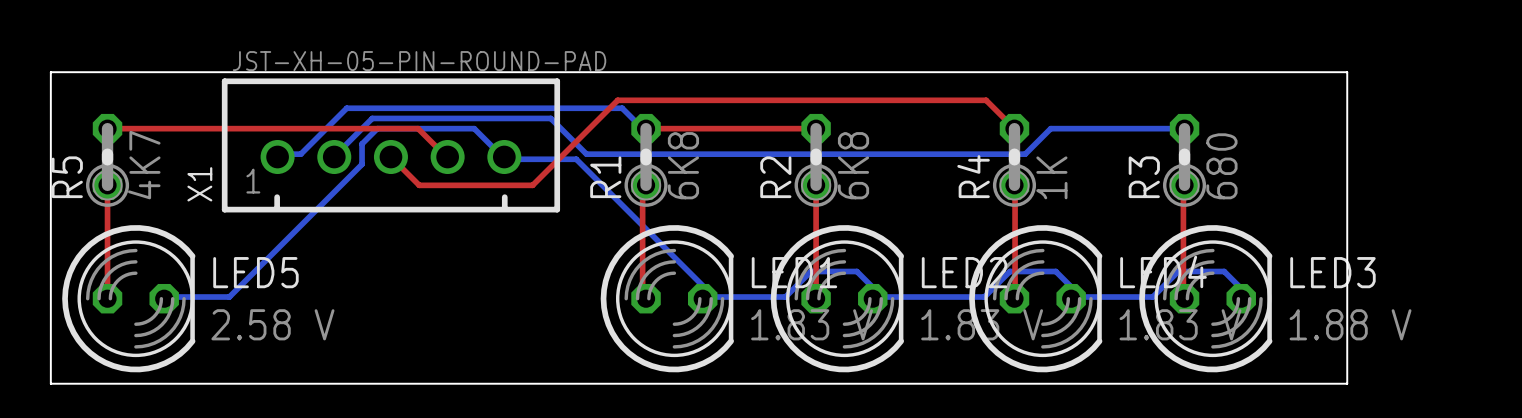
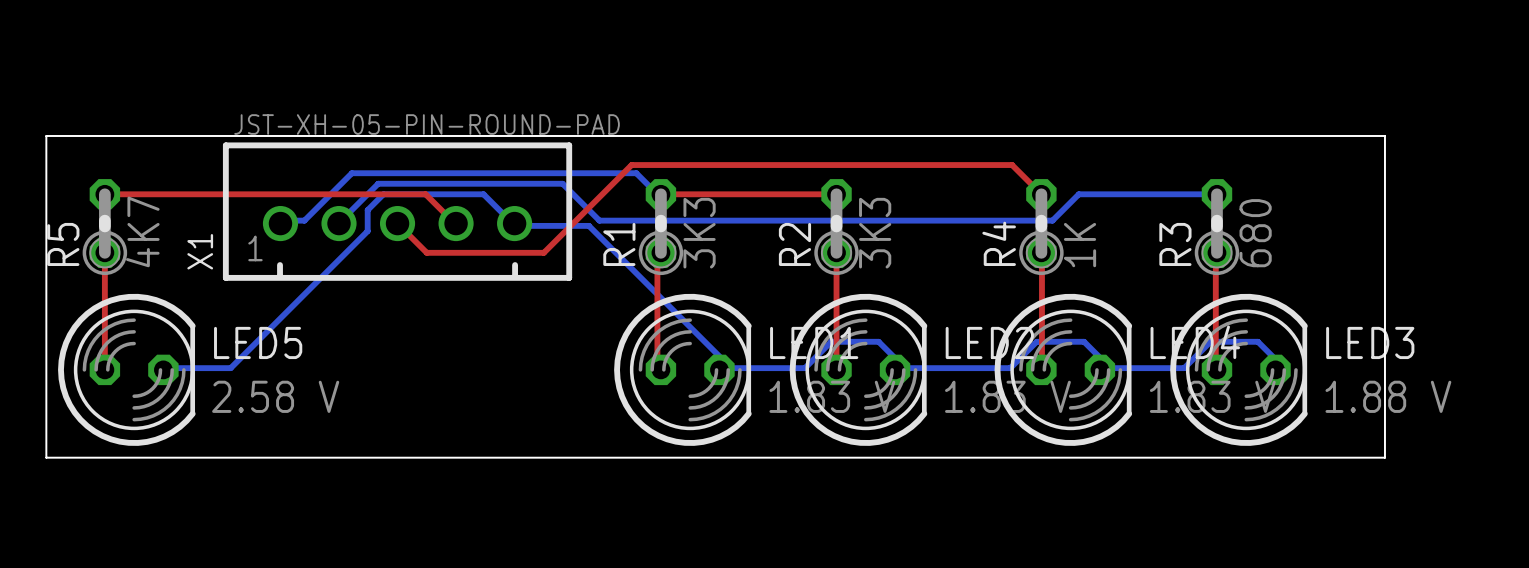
R1 value: 6K8 (683, 165) -> 3K3 (699, 233)
R2 value: 6K8 (853, 165) -> 3K3 (875, 233)

